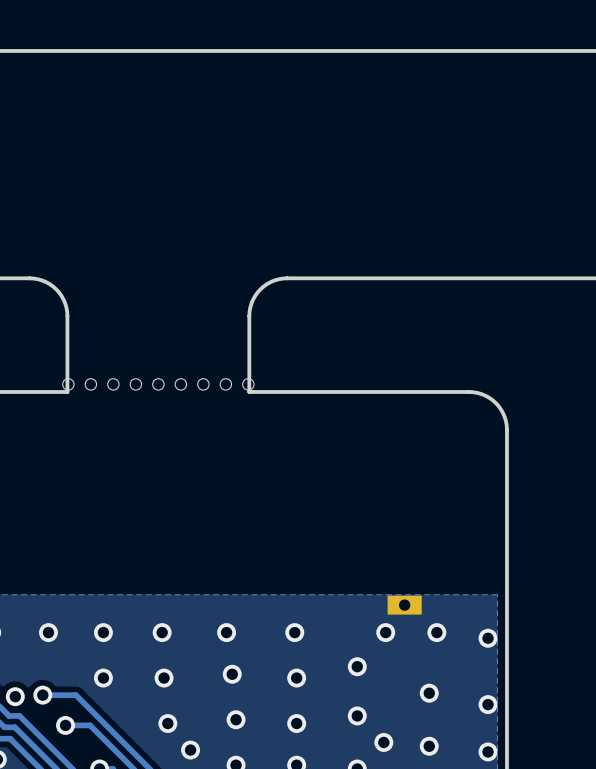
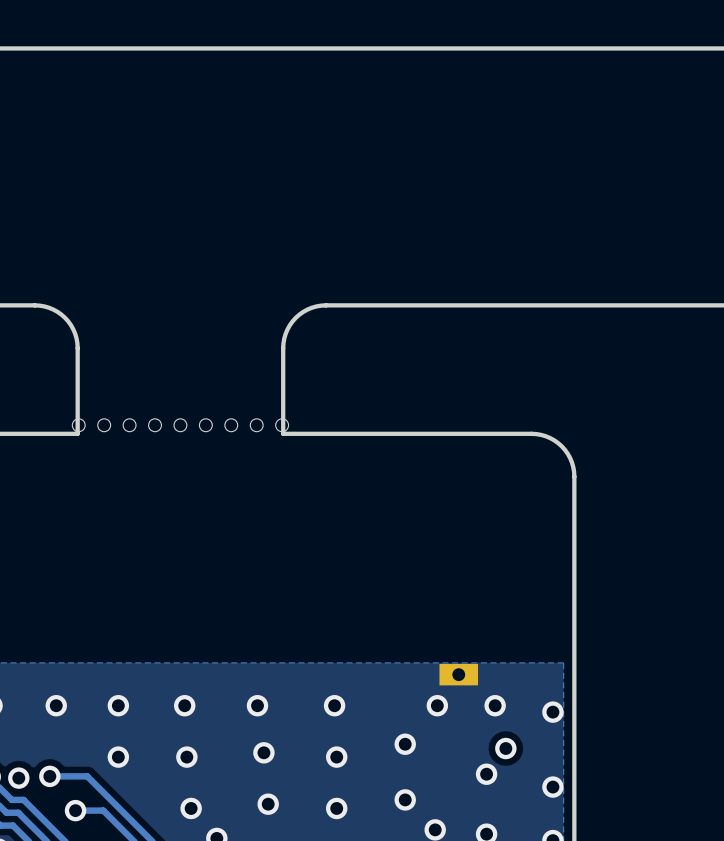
via: none -> (505, 748)

